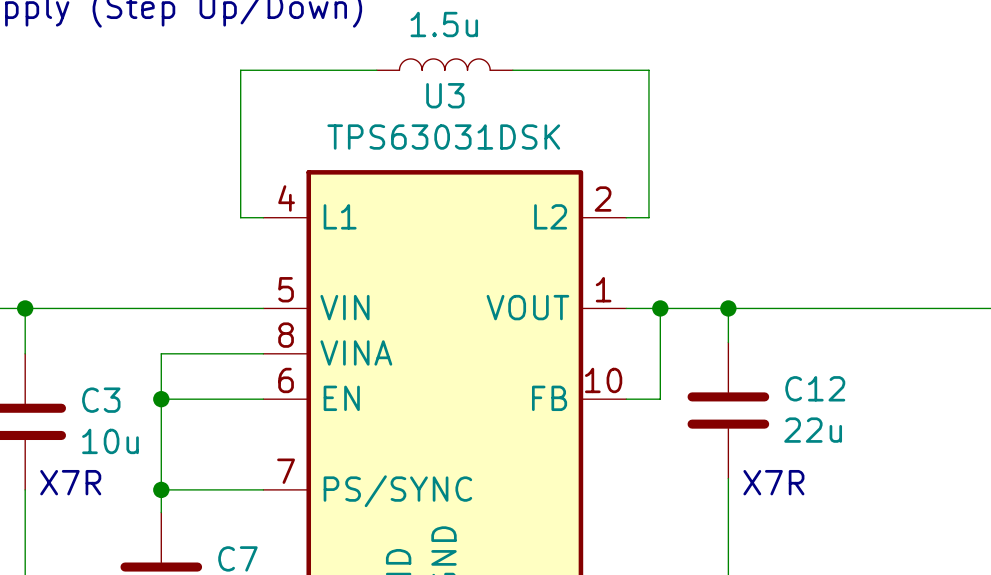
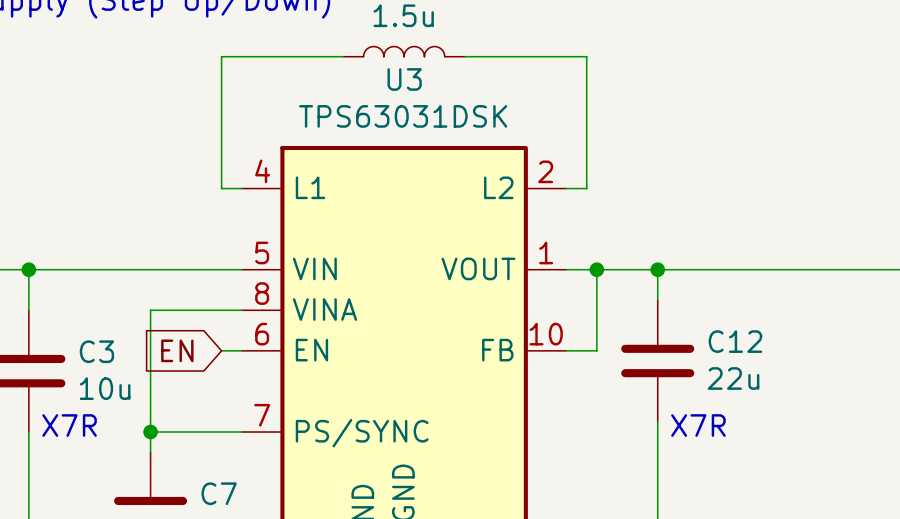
wire: (161, 399) (240, 399) -> none
junction: (161, 399) -> none
global label: none -> EN (177, 350)

